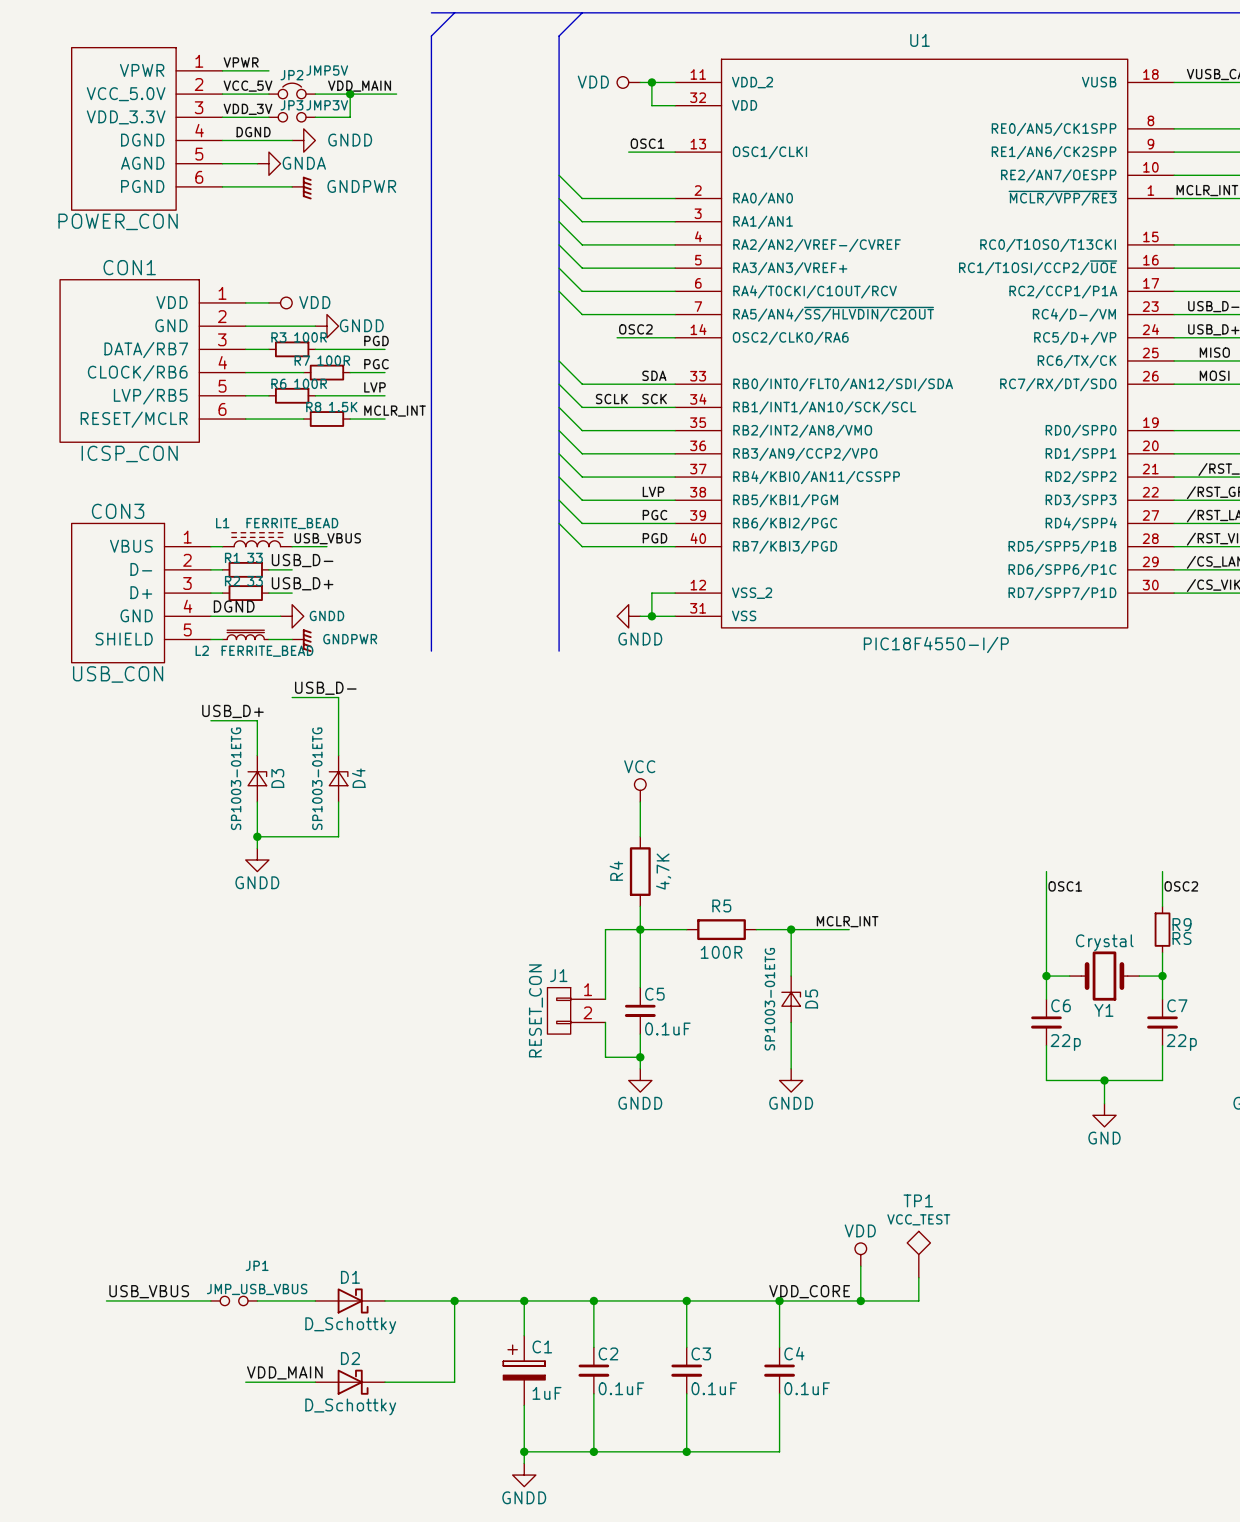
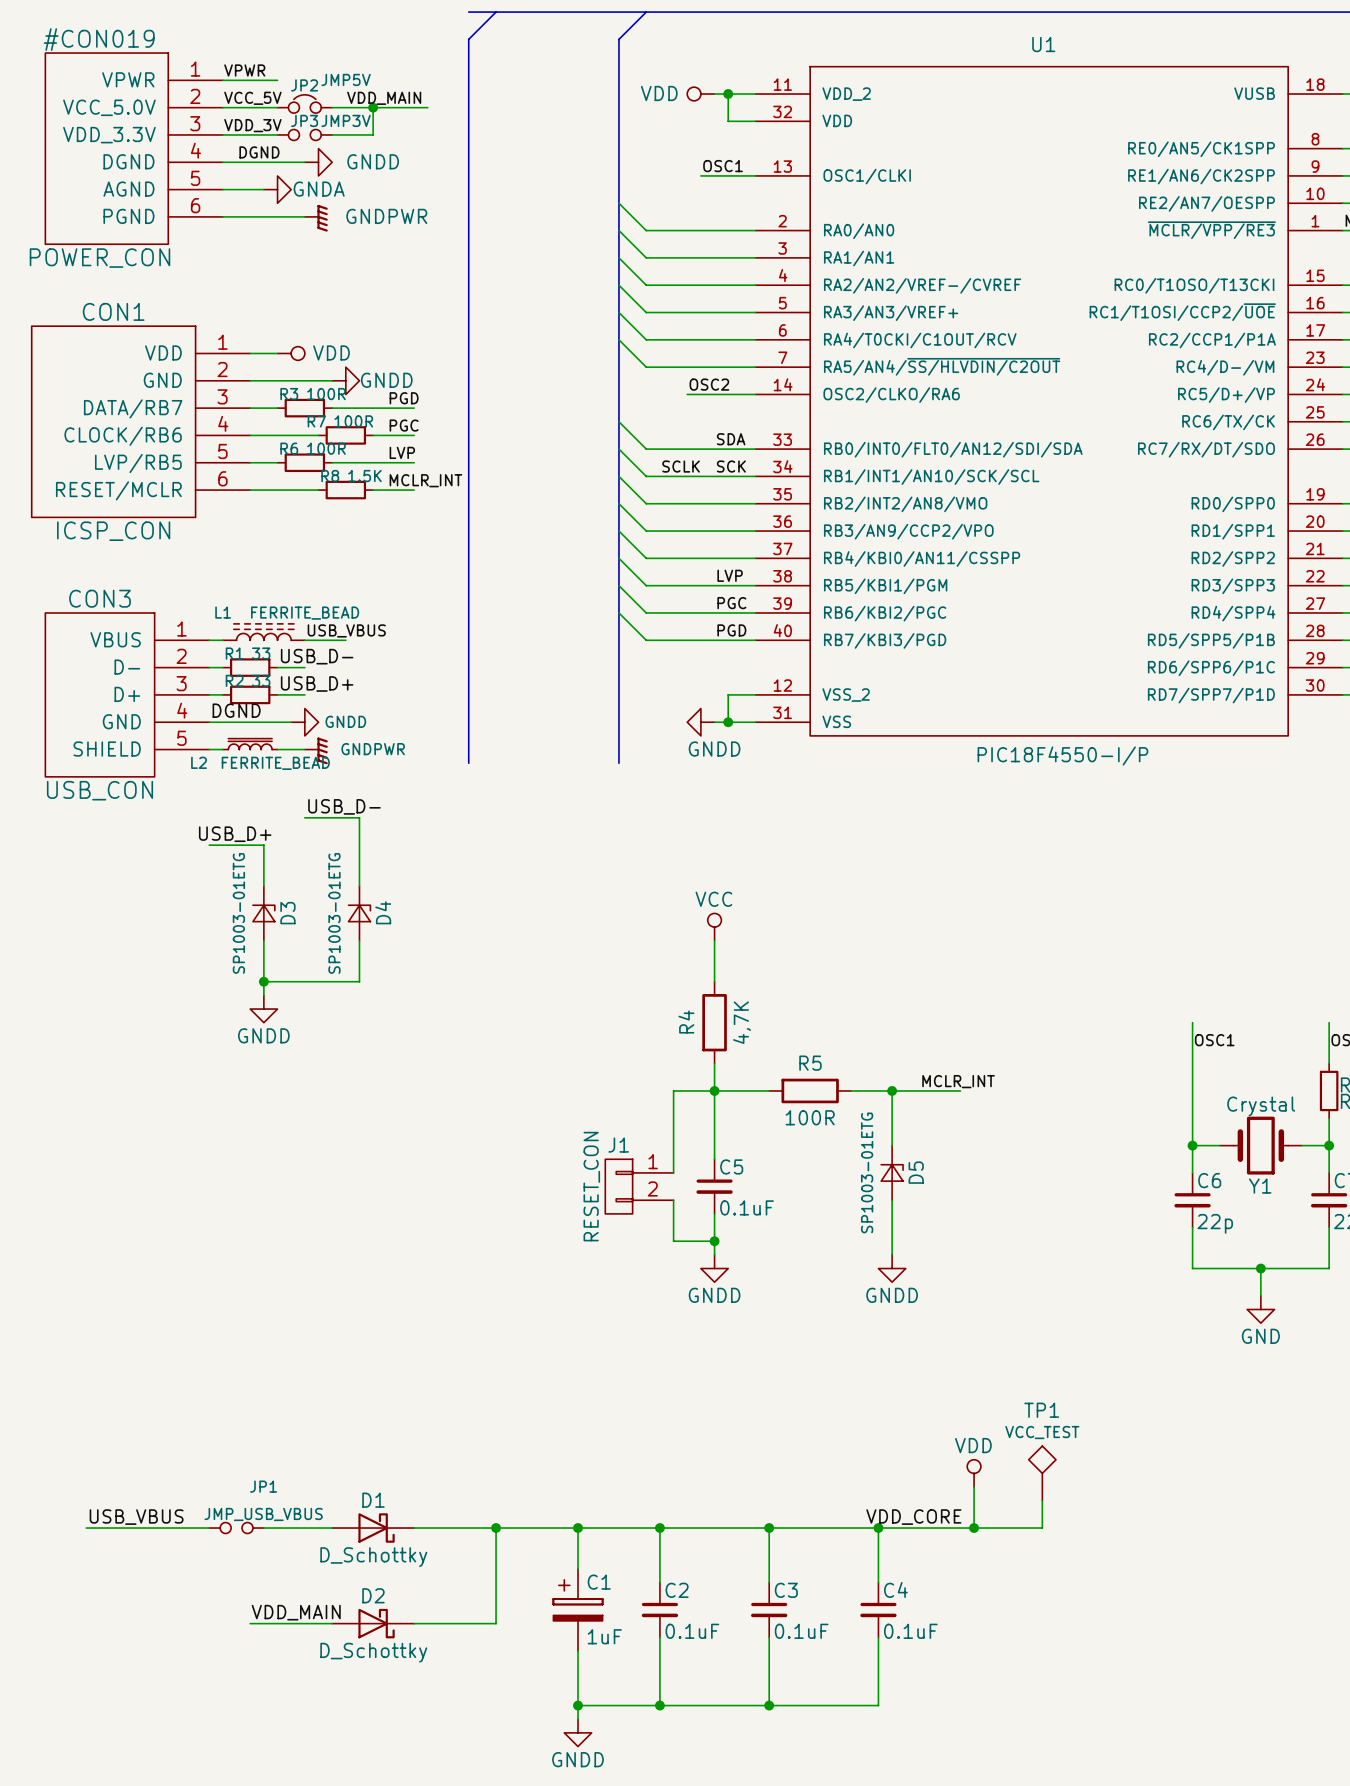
#CON019 name: none -> #CON019 (99, 39)

